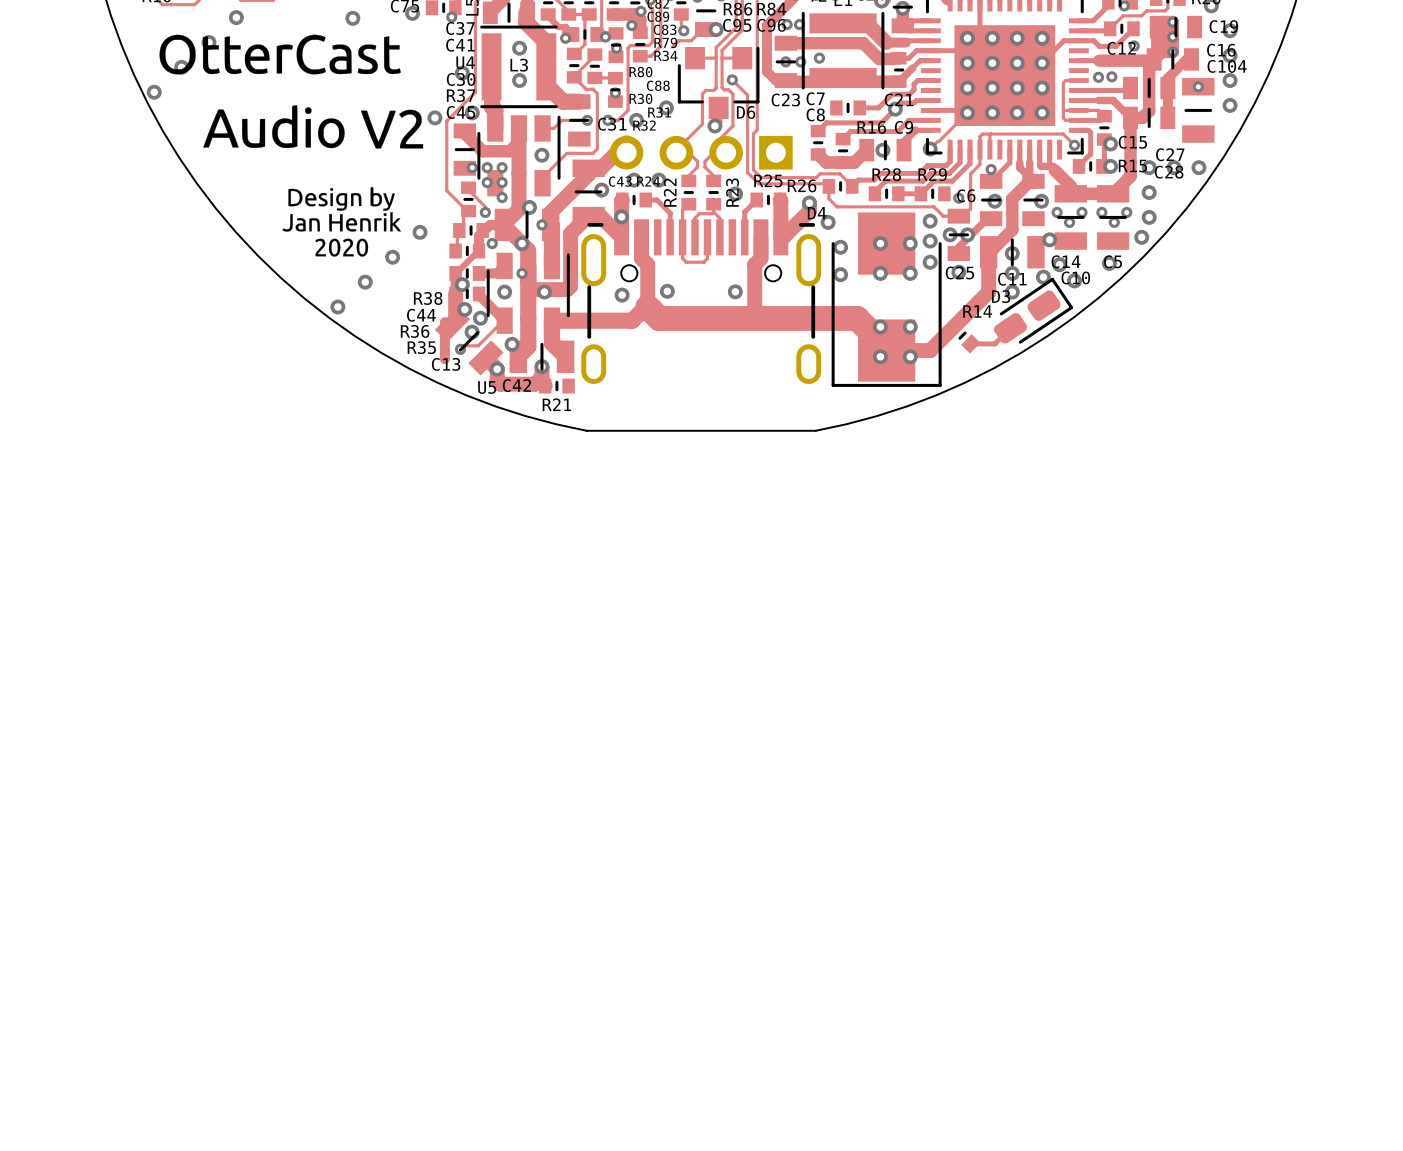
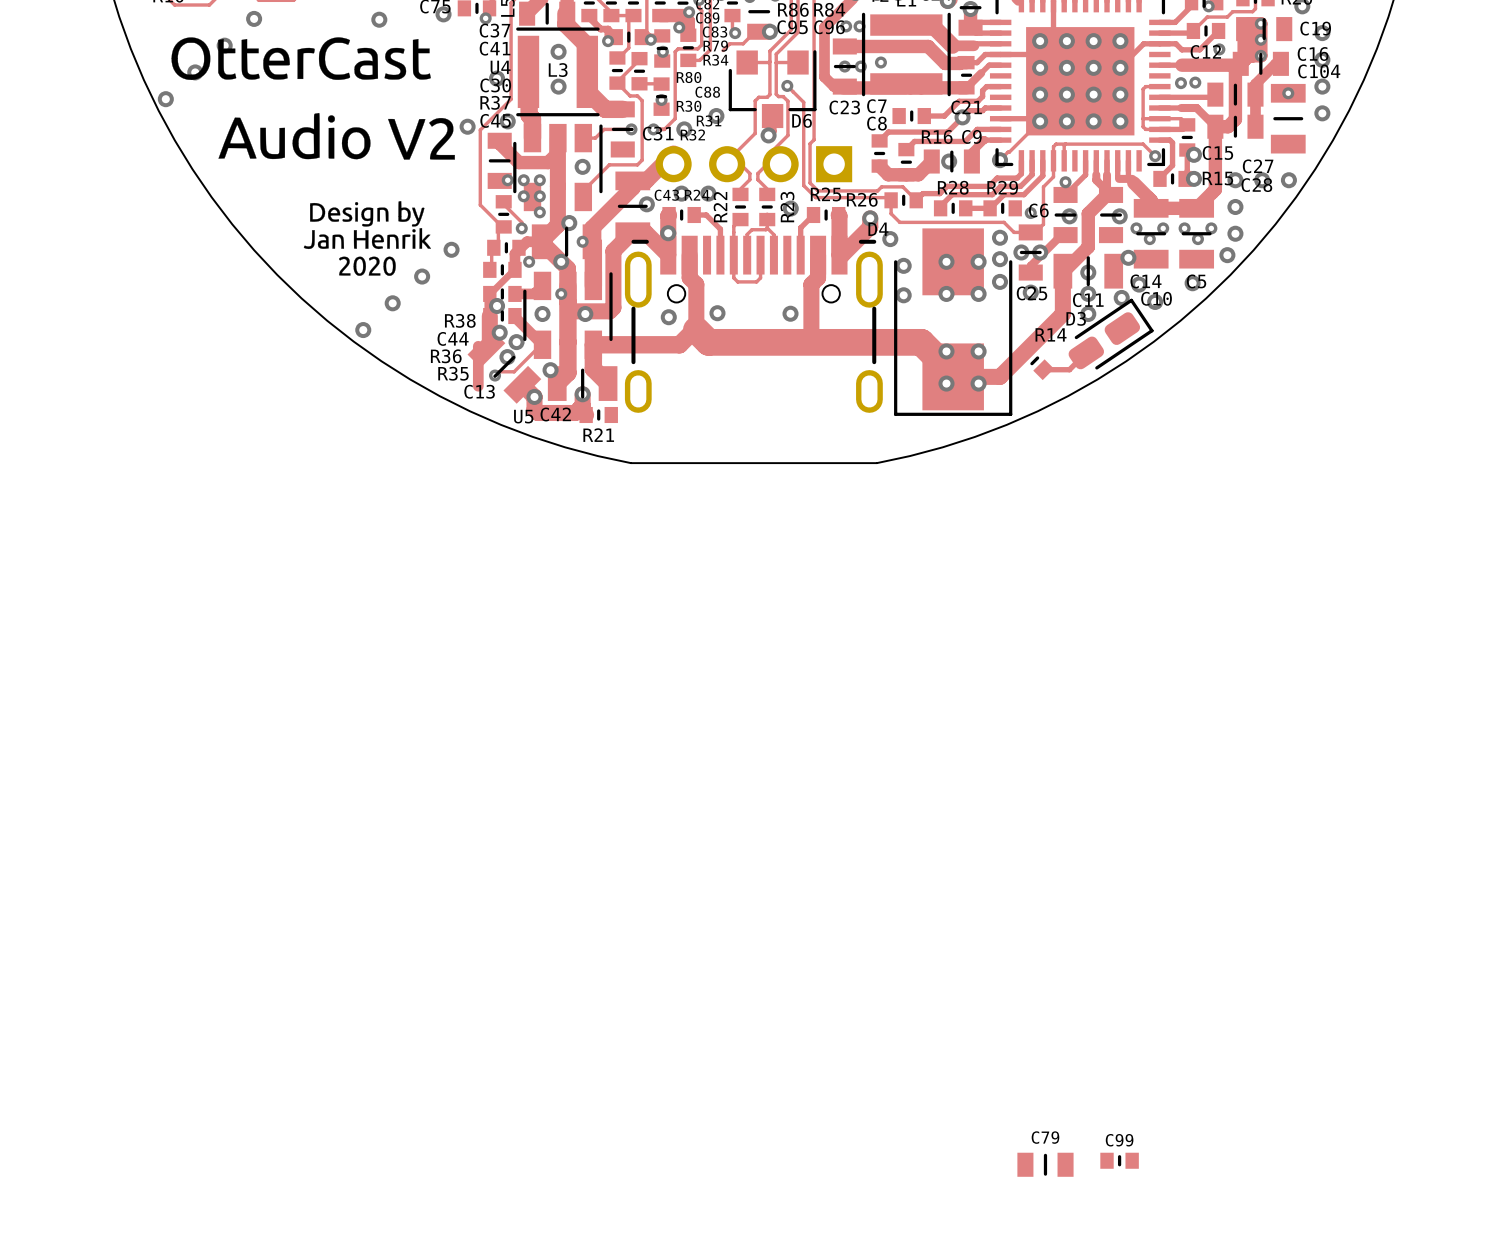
C99: none -> (1119, 1160)
C79: none -> (1045, 1164)

